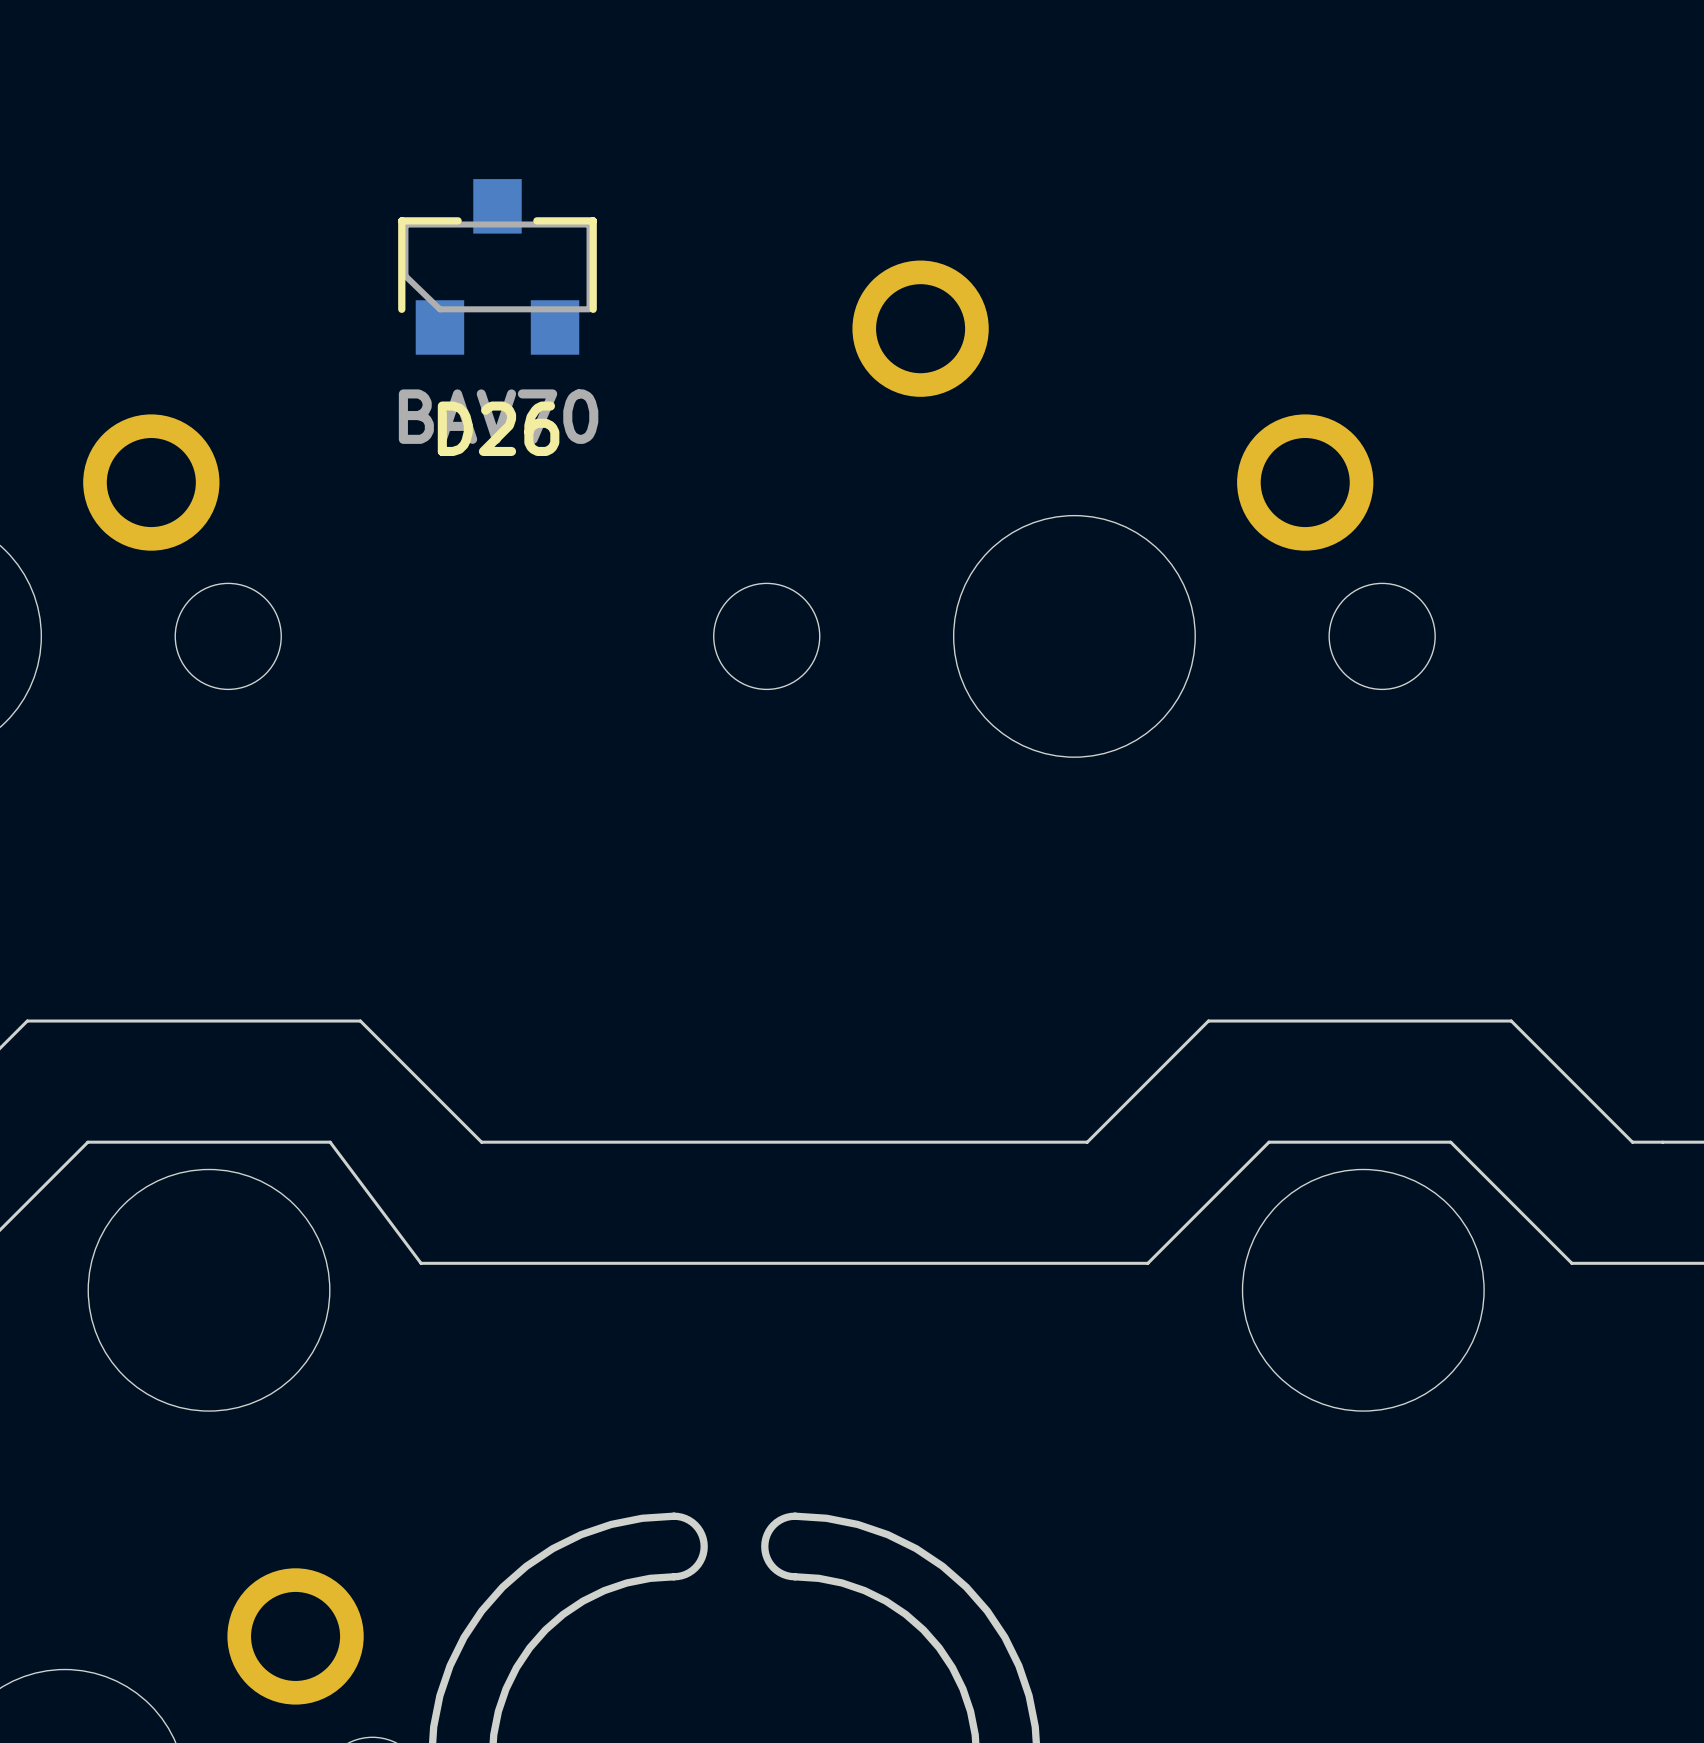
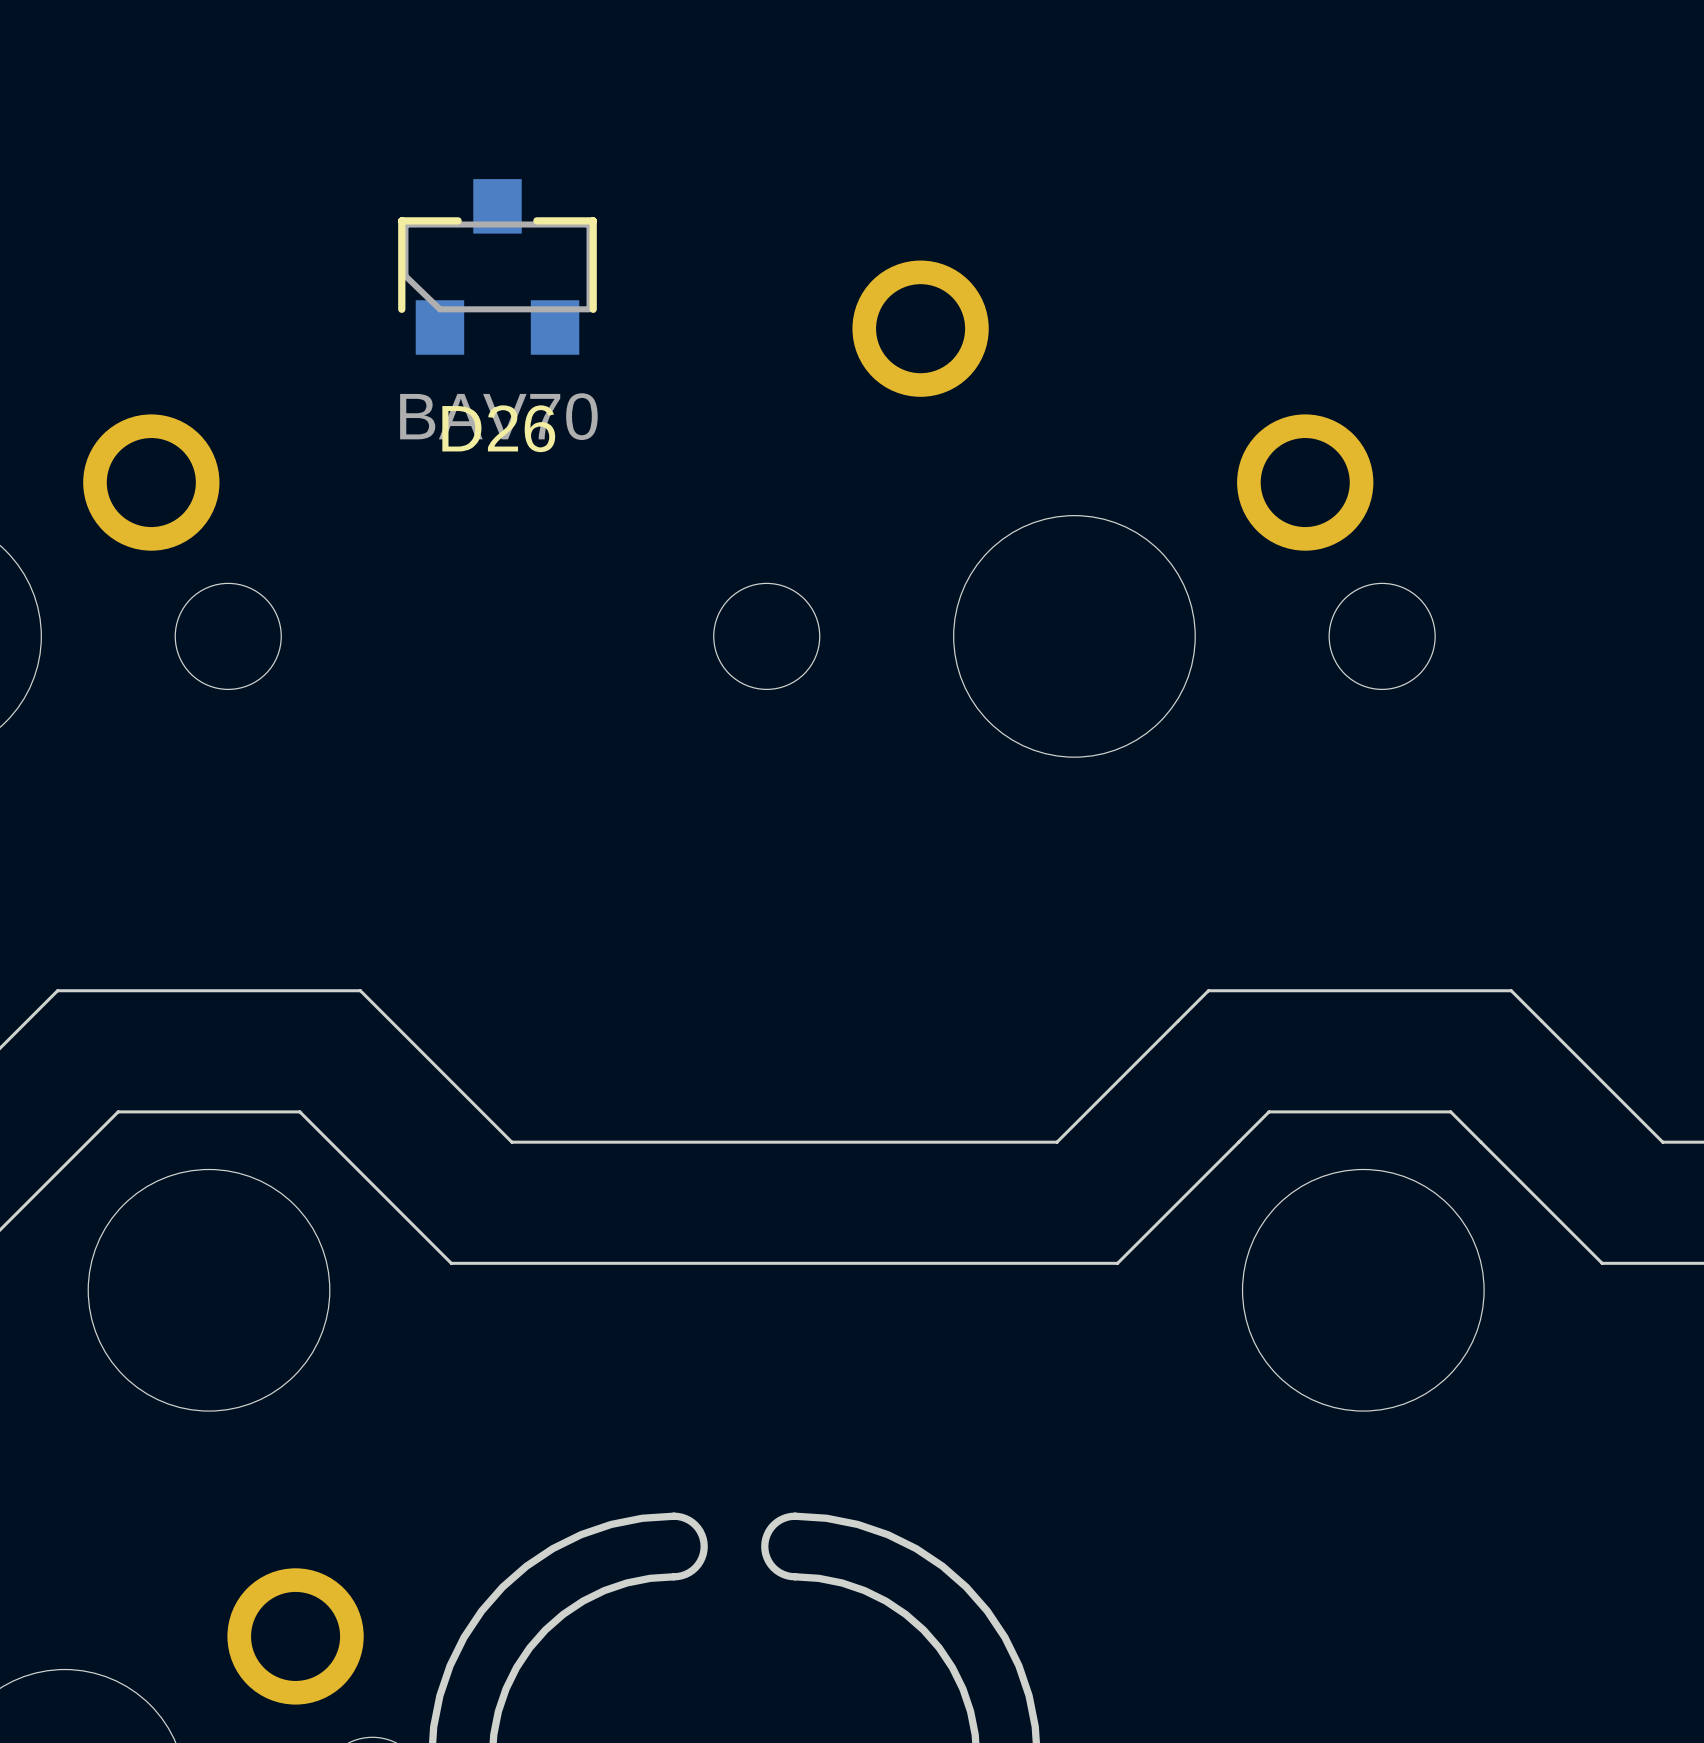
board edge: (27, 1021) (360, 1021) (481, 1142) (511, 1142) -> (27, 1021) (57, 990) (360, 990) (511, 1142)
board edge: (87, 1142) (330, 1142) (421, 1263) (451, 1263) -> (87, 1142) (118, 1111) (299, 1111) (451, 1263)
board edge: (1662, 1142) (1632, 1142) (1511, 1021) (1208, 1021) (1087, 1142) (1057, 1142) -> (1662, 1142) (1511, 990) (1208, 990) (1057, 1142)
board edge: (1602, 1263) (1571, 1263) (1450, 1142) (1269, 1142) (1147, 1263) (1117, 1263) -> (1602, 1263) (1450, 1111) (1269, 1111) (1117, 1263)

